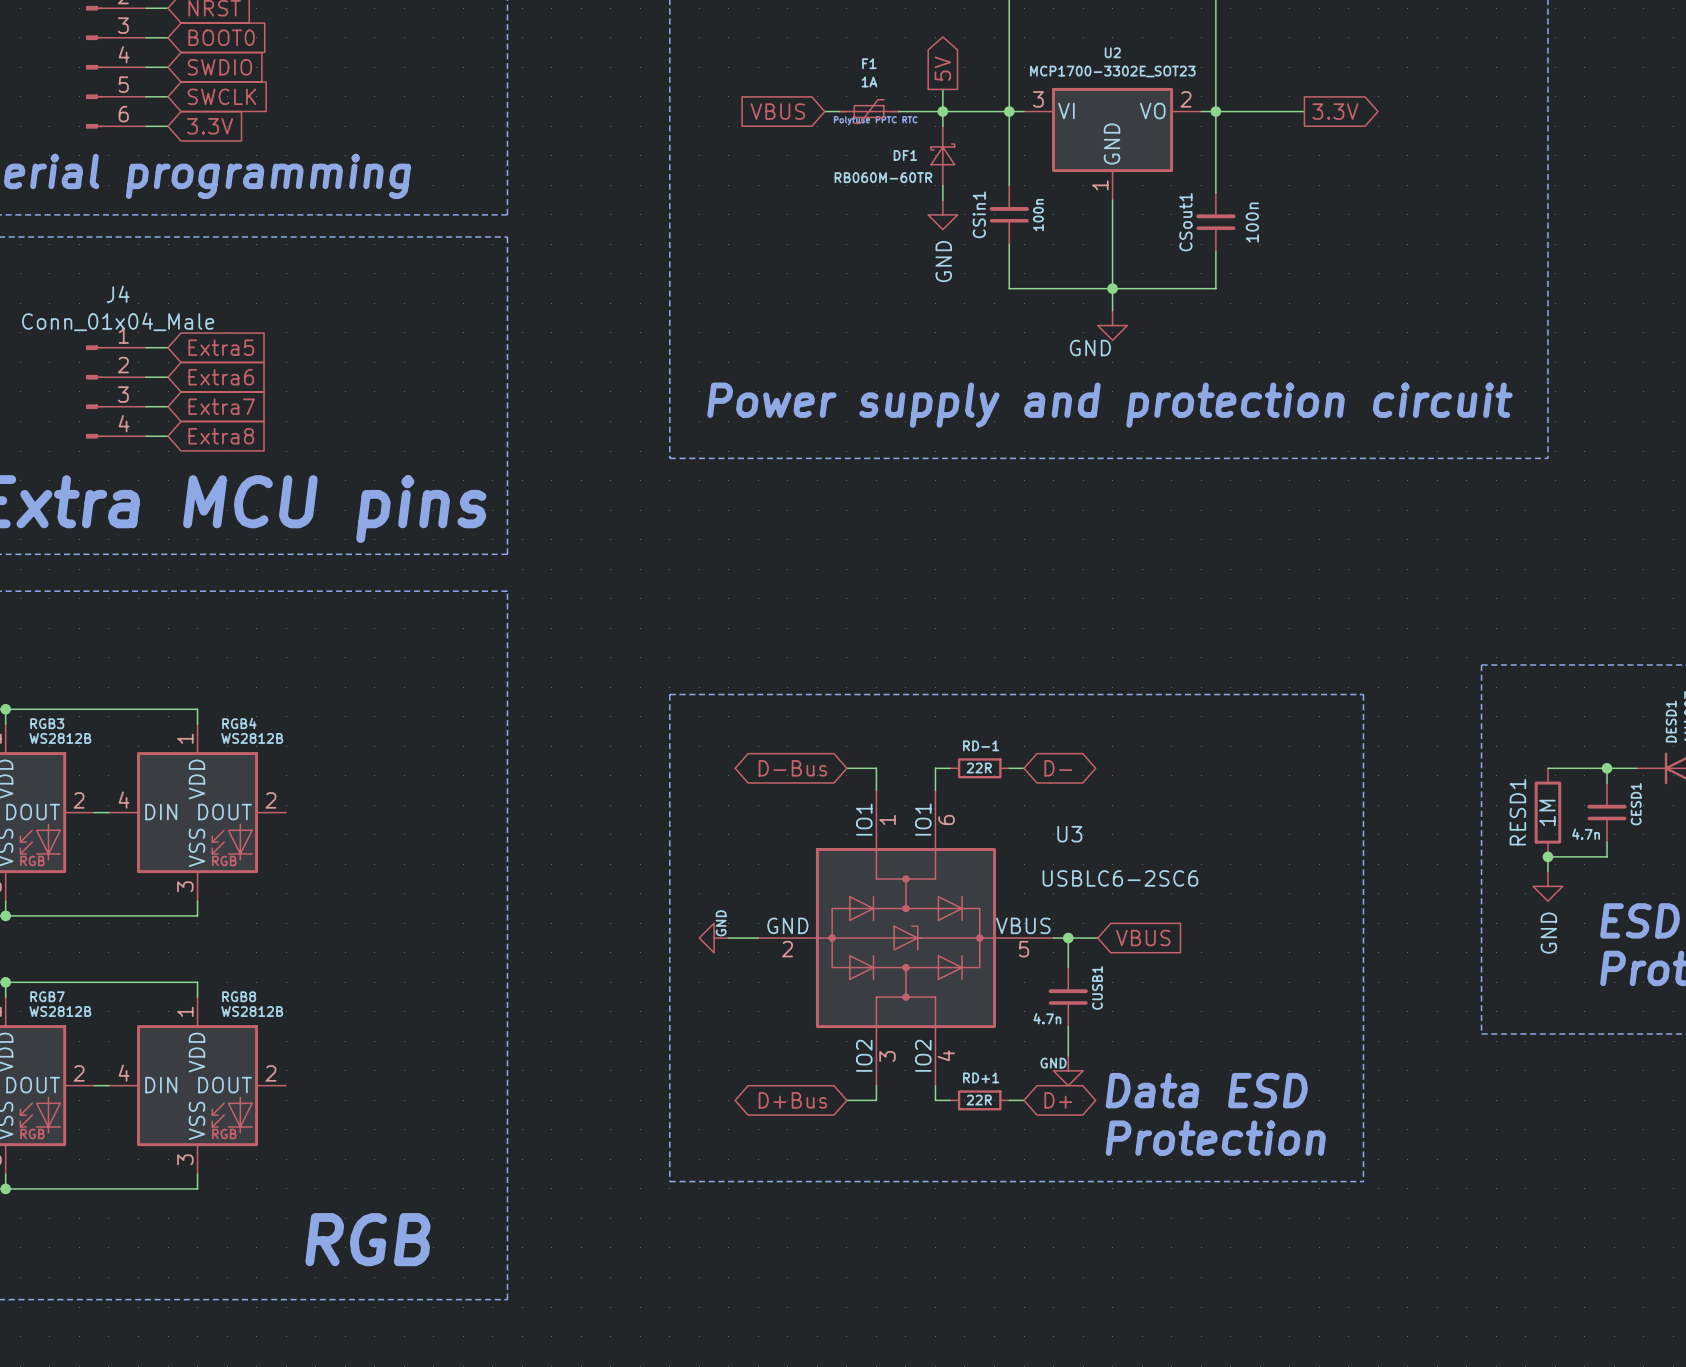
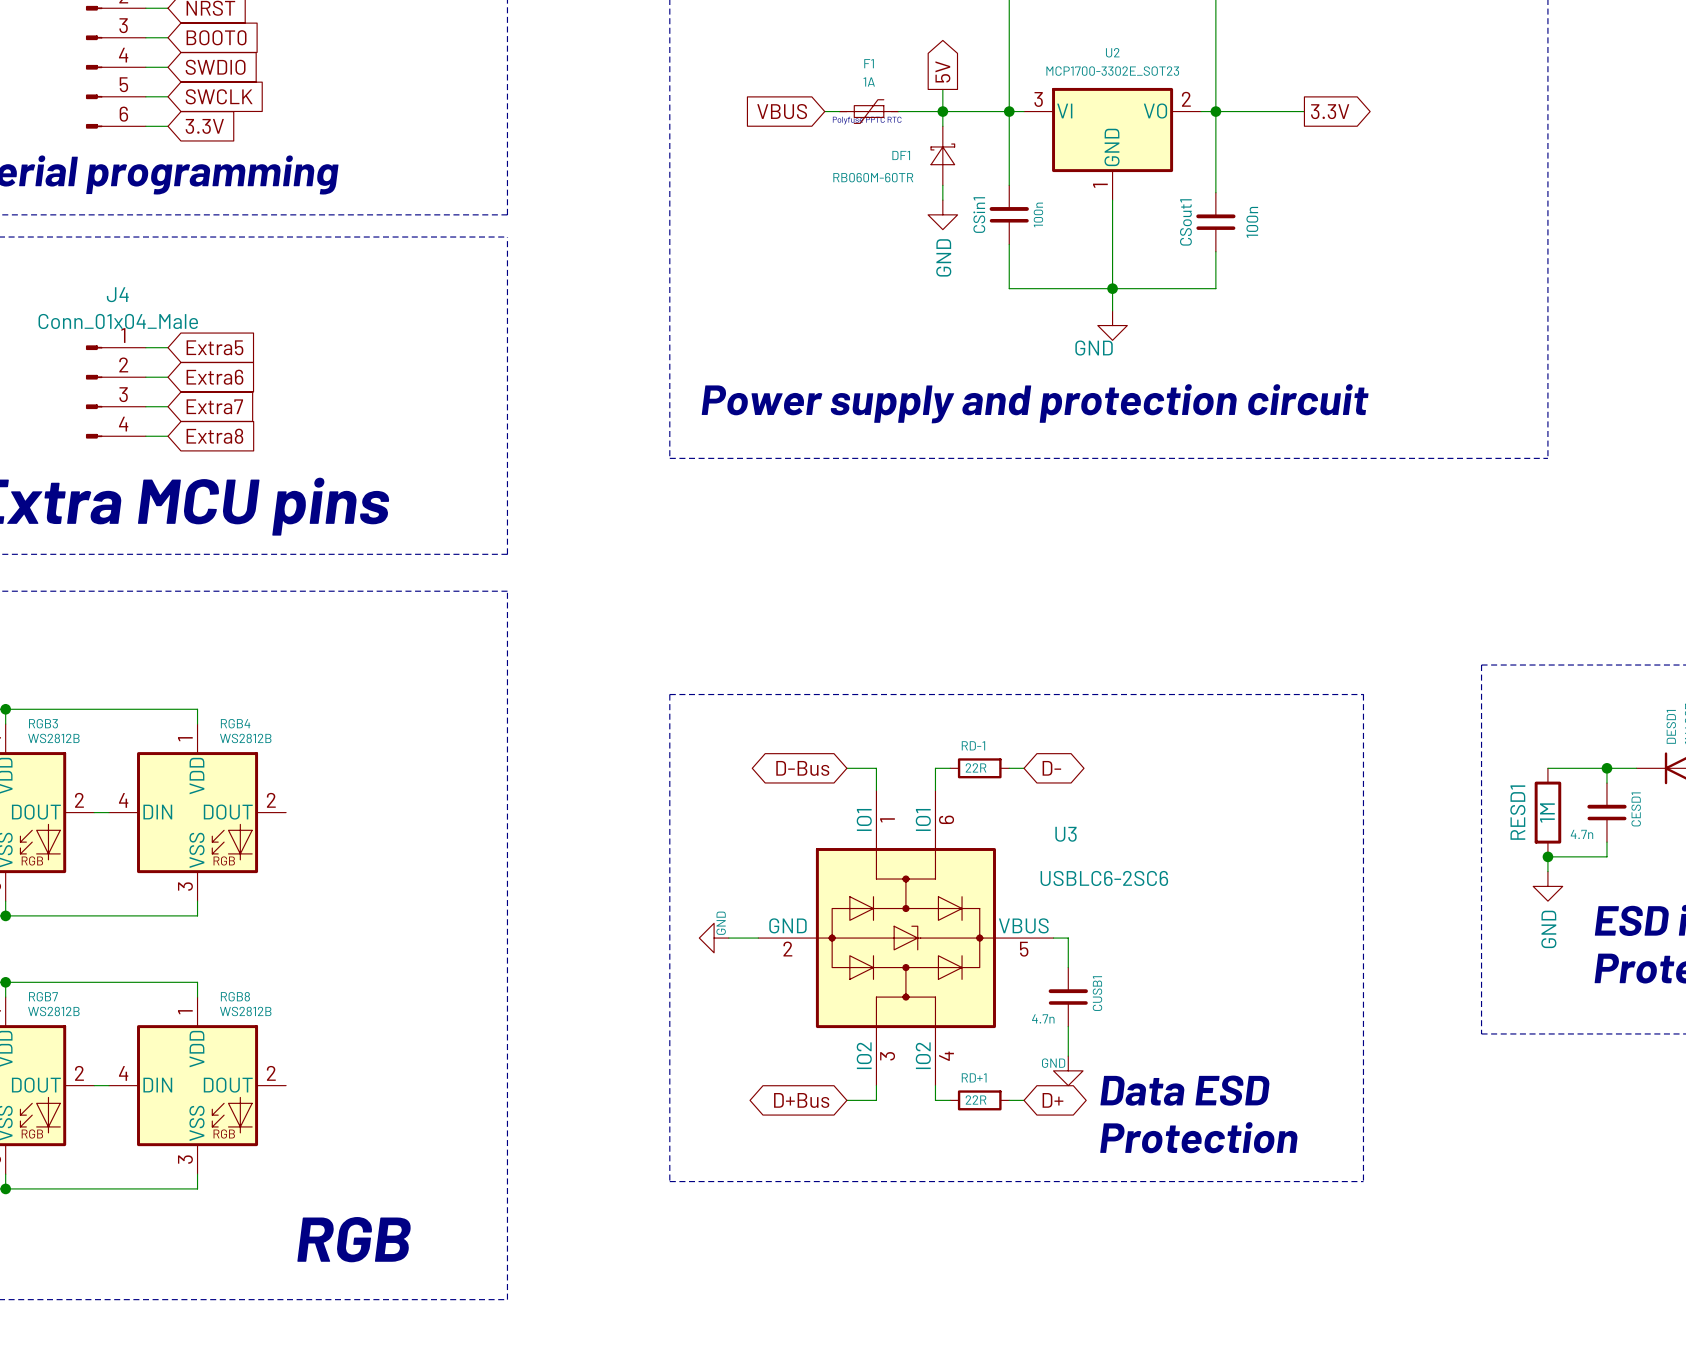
wire: (1068, 938) (1097, 938) -> none
junction: (1068, 938) -> none
global label: VBUS (1143, 938) -> none

